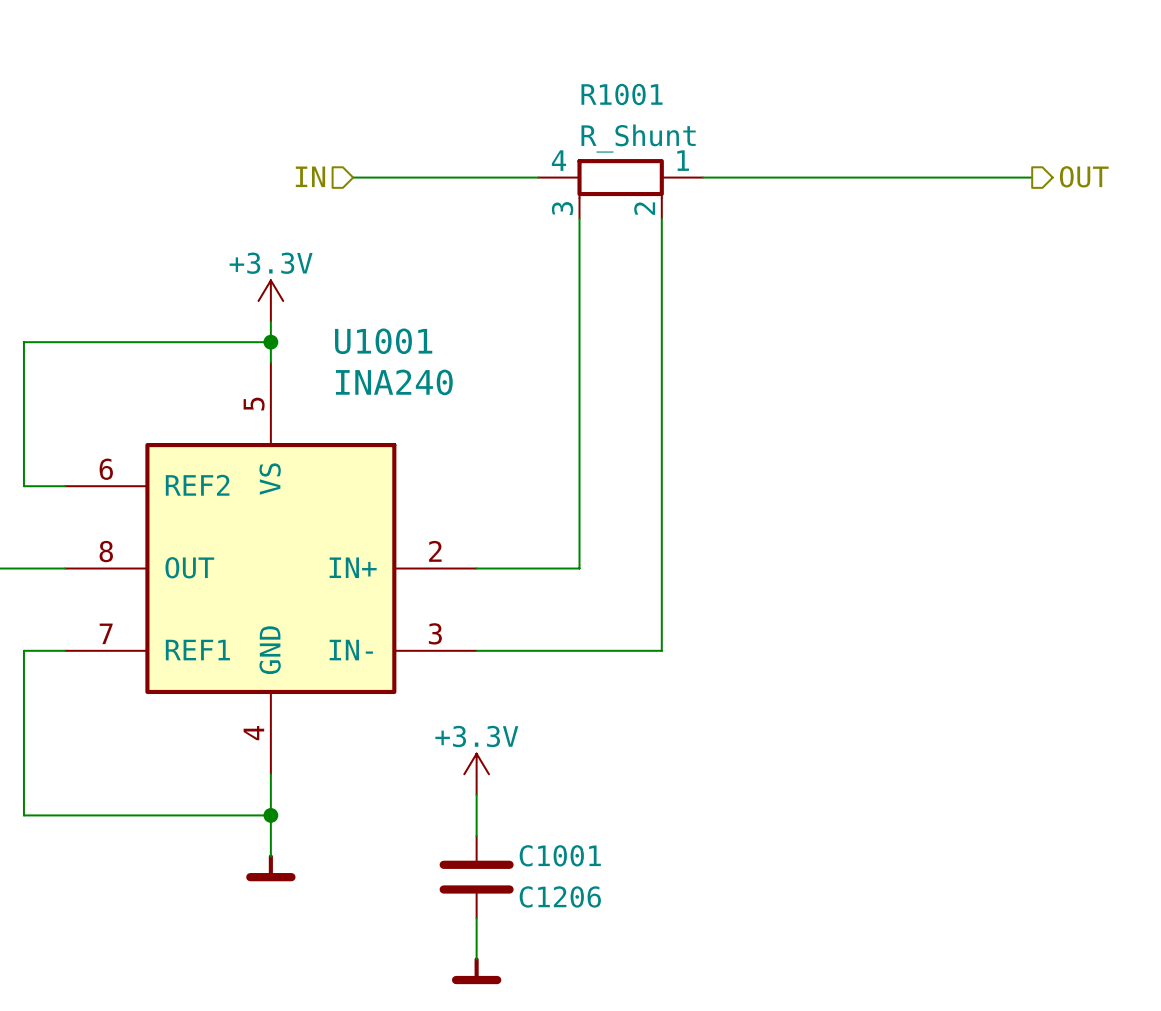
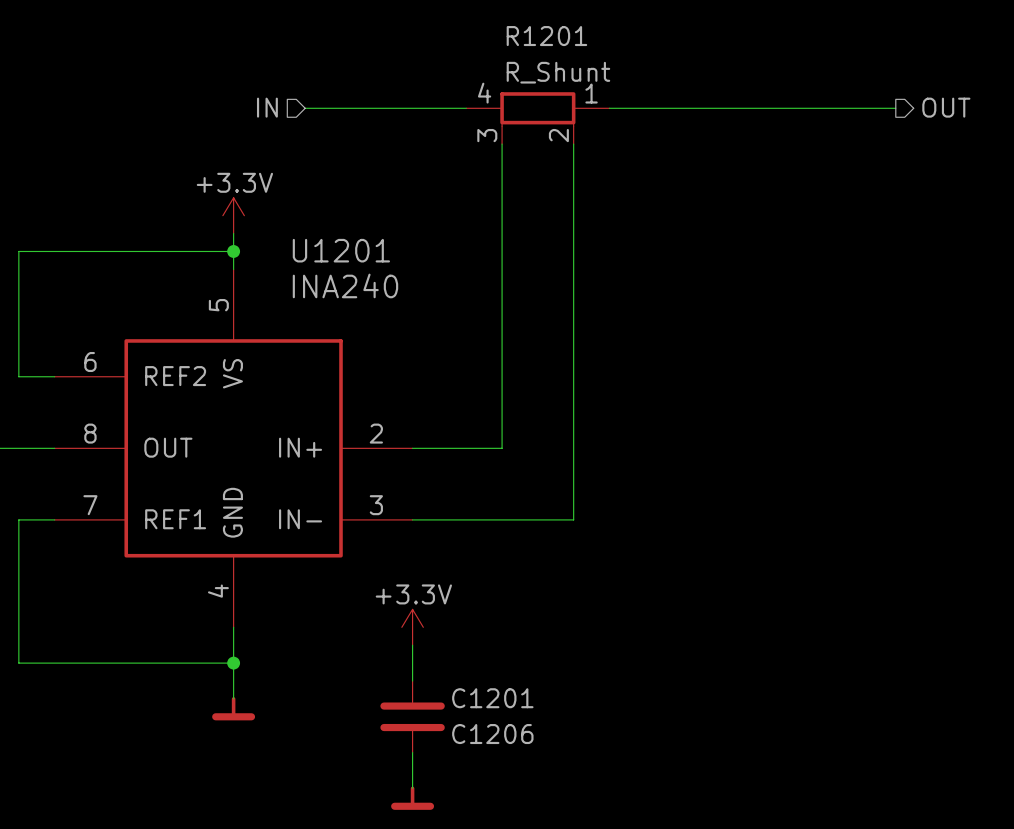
R1001 name: R1001 (622, 94) -> R1201 (546, 36)
U1001 name: U1001 (383, 341) -> U1201 (341, 250)
C1001 name: C1001 (560, 855) -> C1201 (492, 698)

